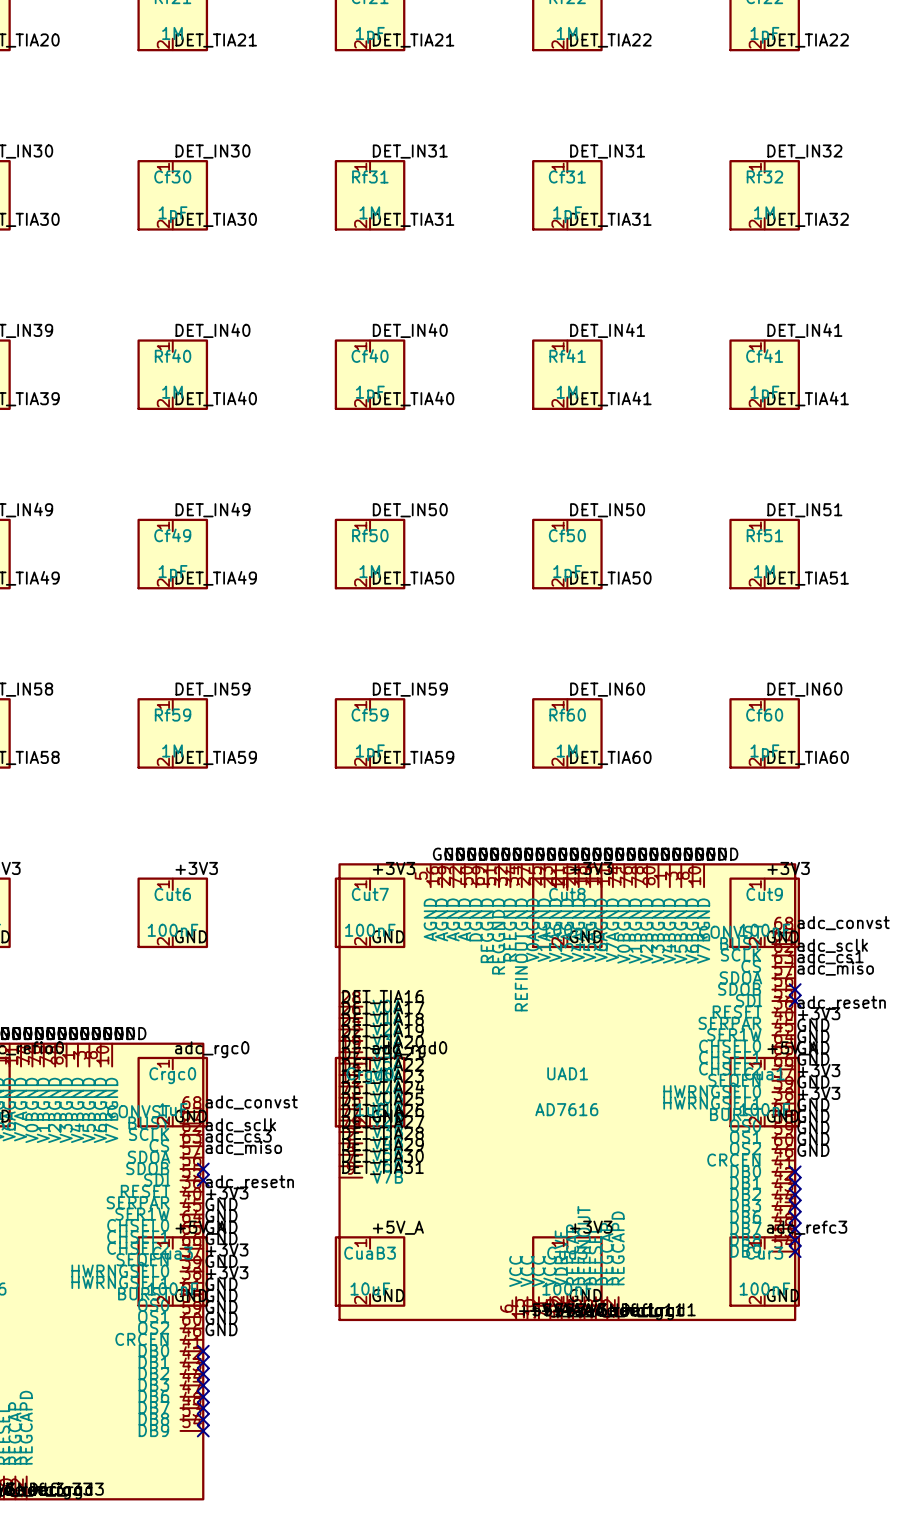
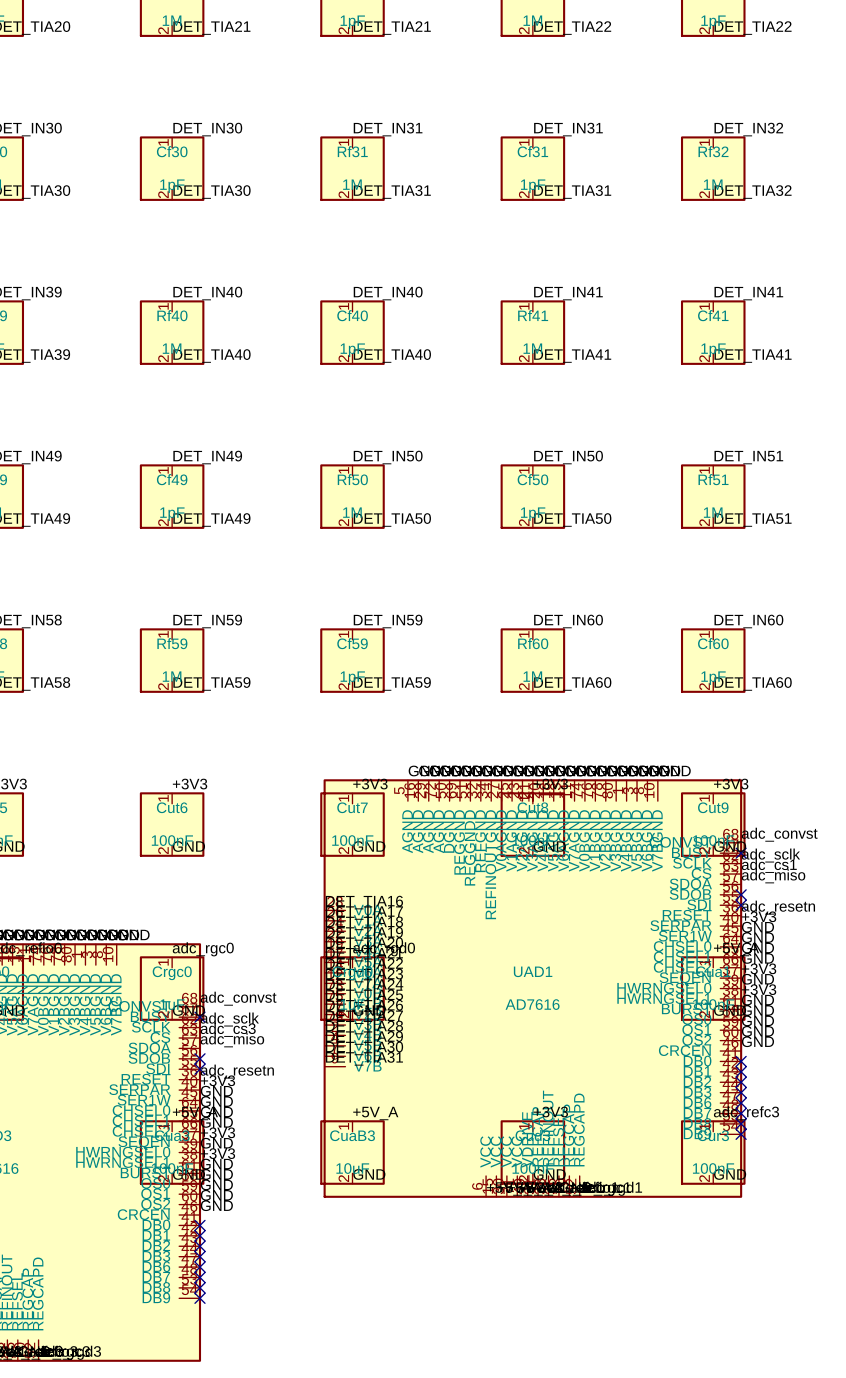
no-connect mark: none -> (741, 853)
no-connect mark: none -> (200, 1017)

